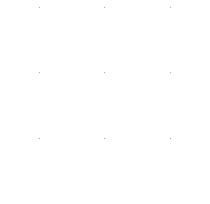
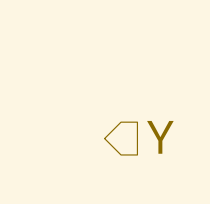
hierarchical label: none -> Y (160, 137)

